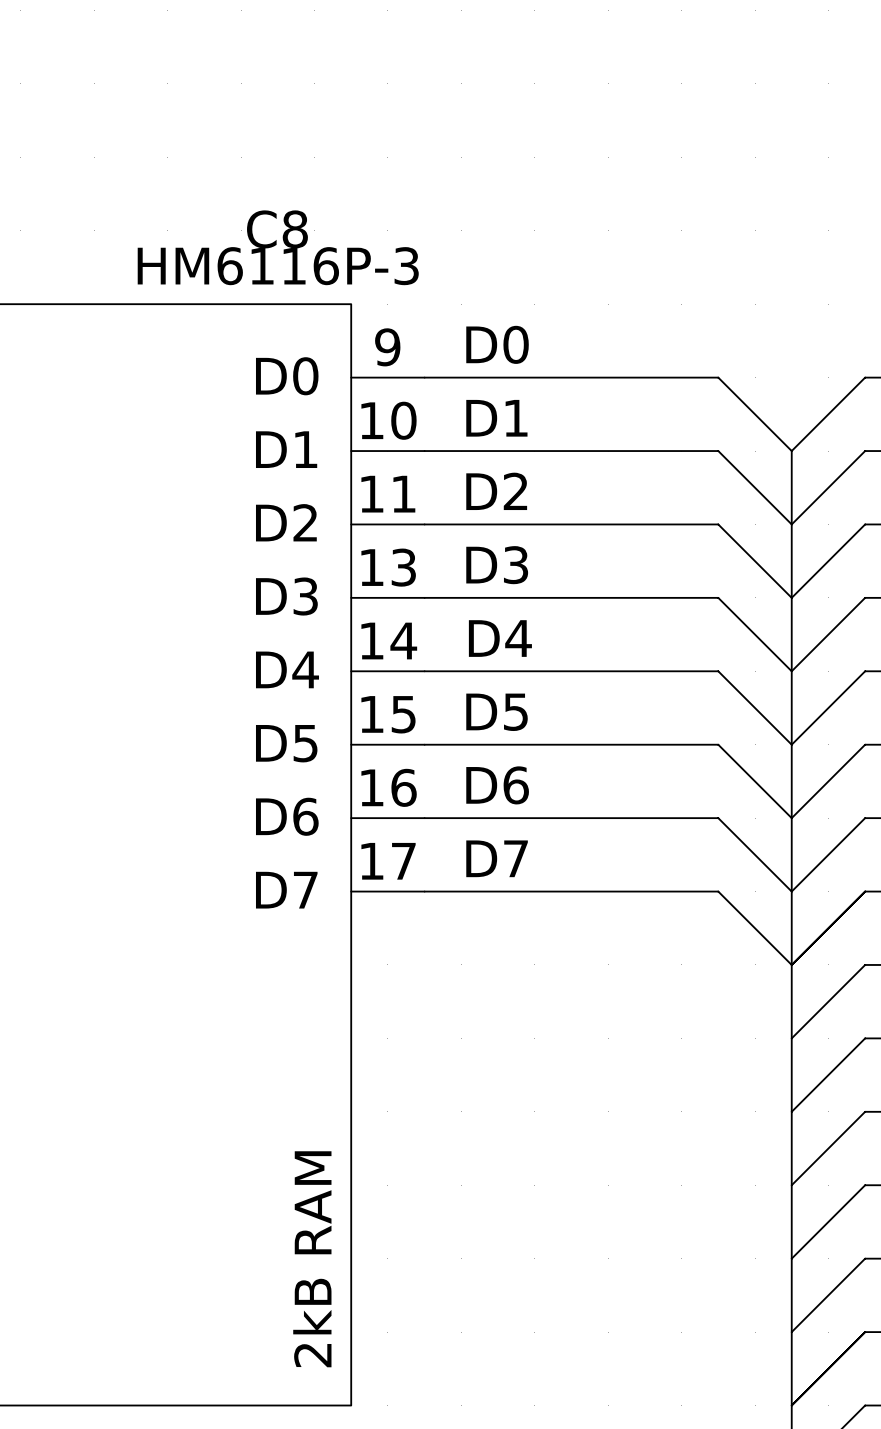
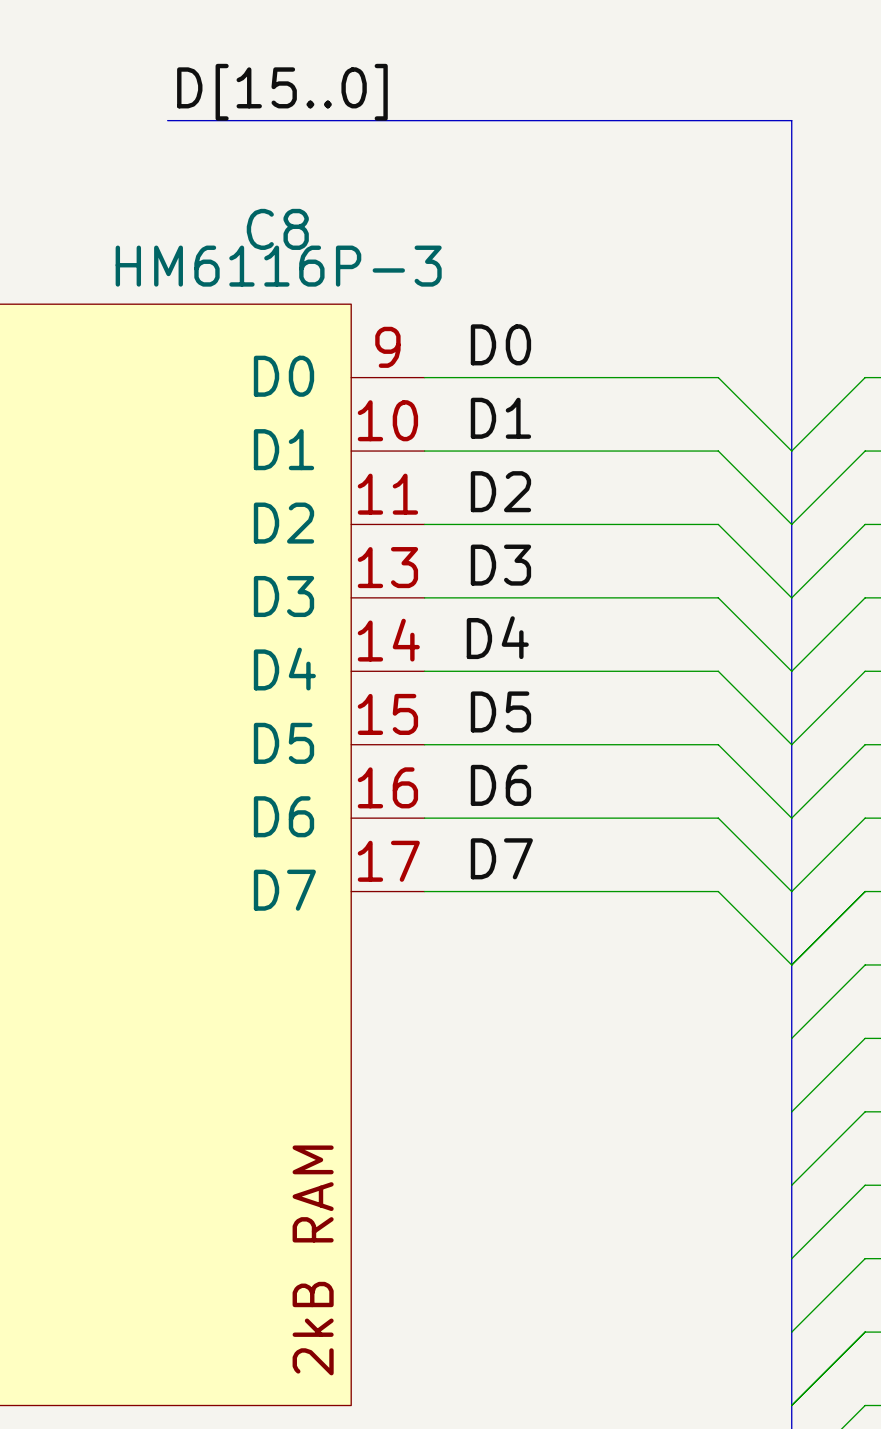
label: none -> D[15..0] (282, 92)
bus: none -> (167, 120) (791, 120) (791, 451)

